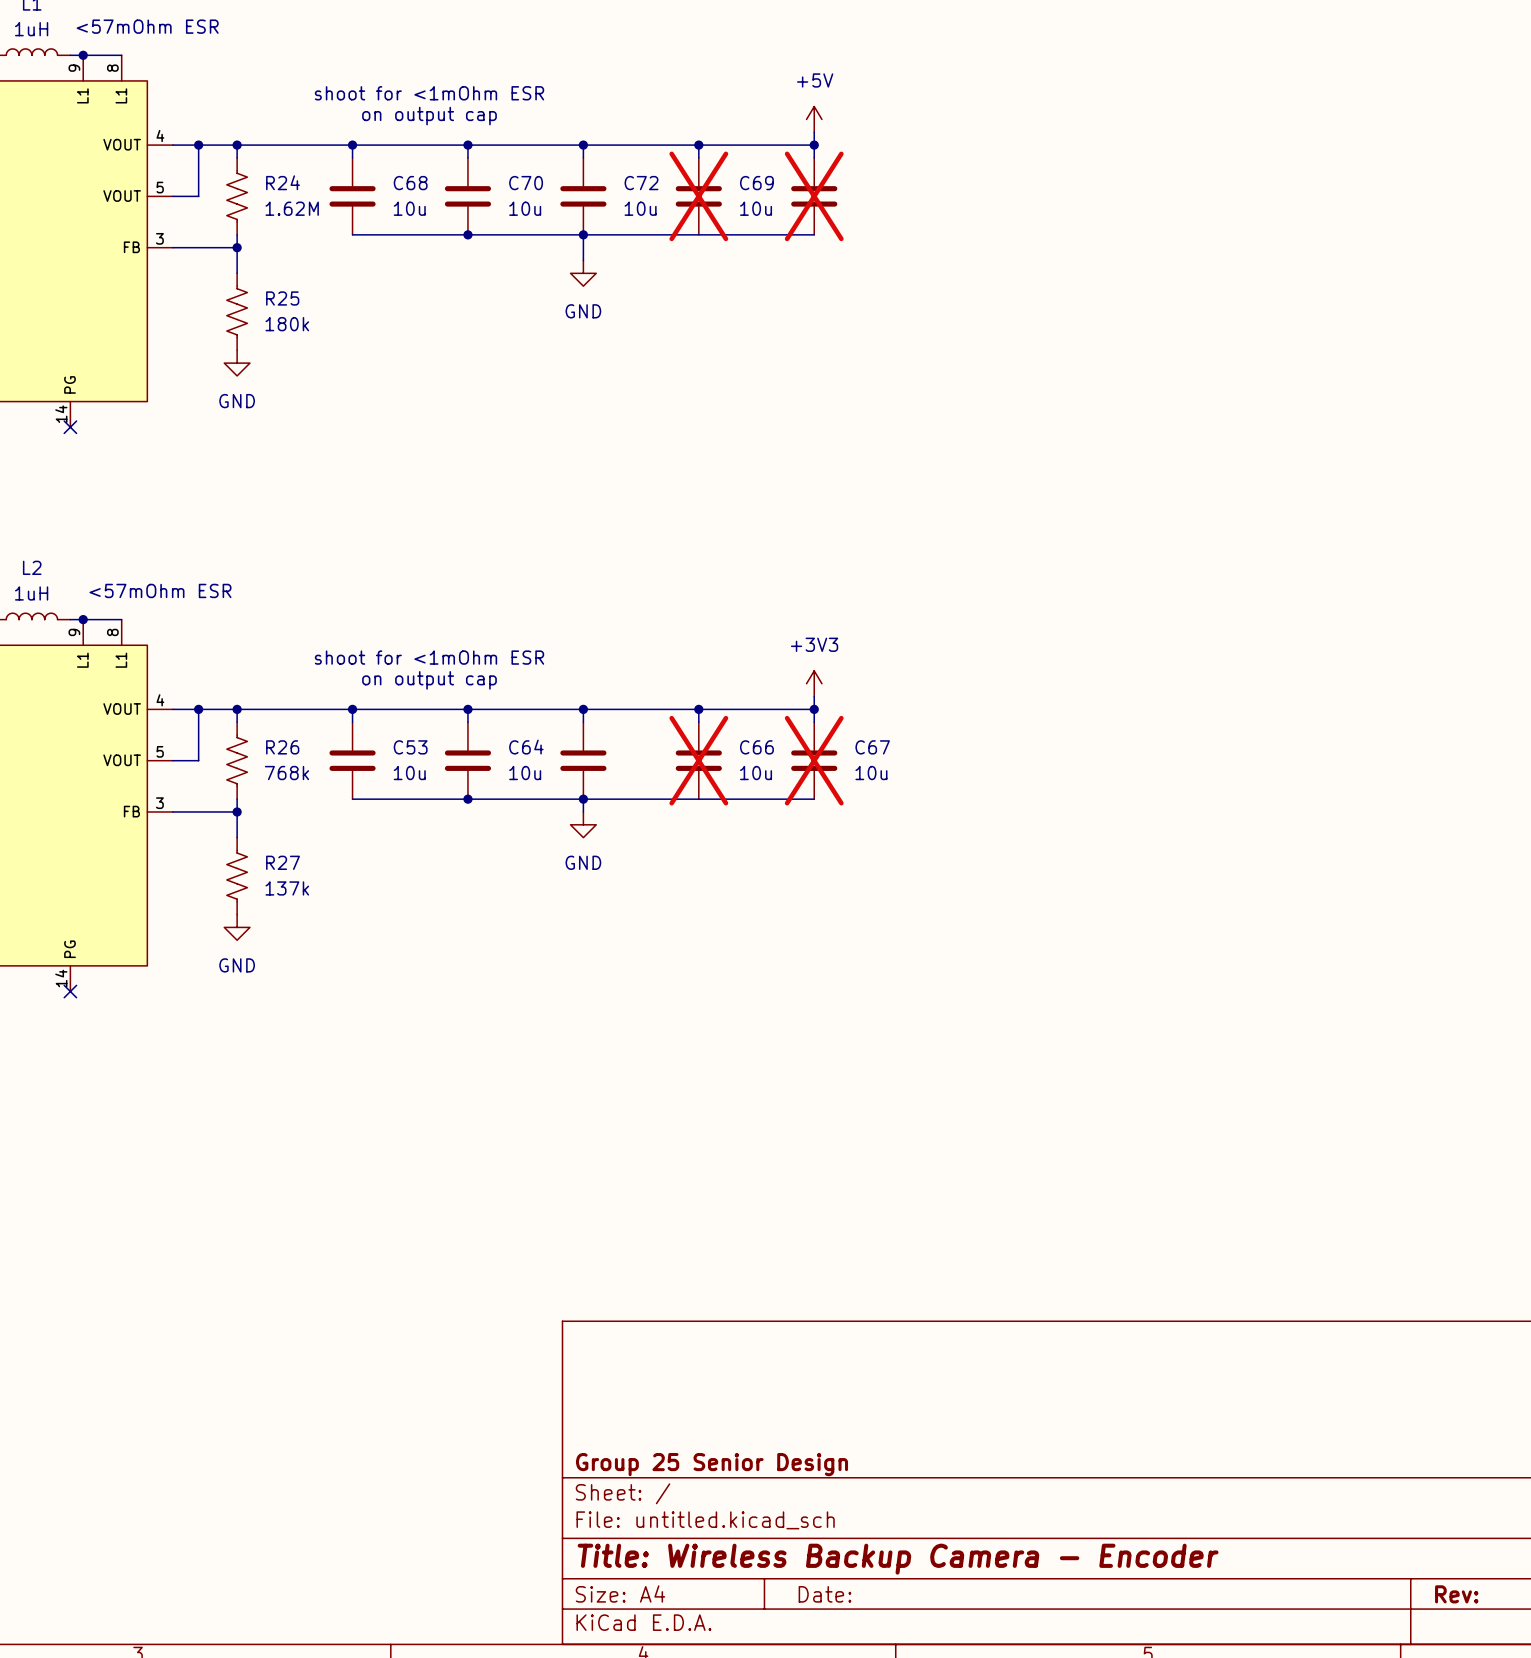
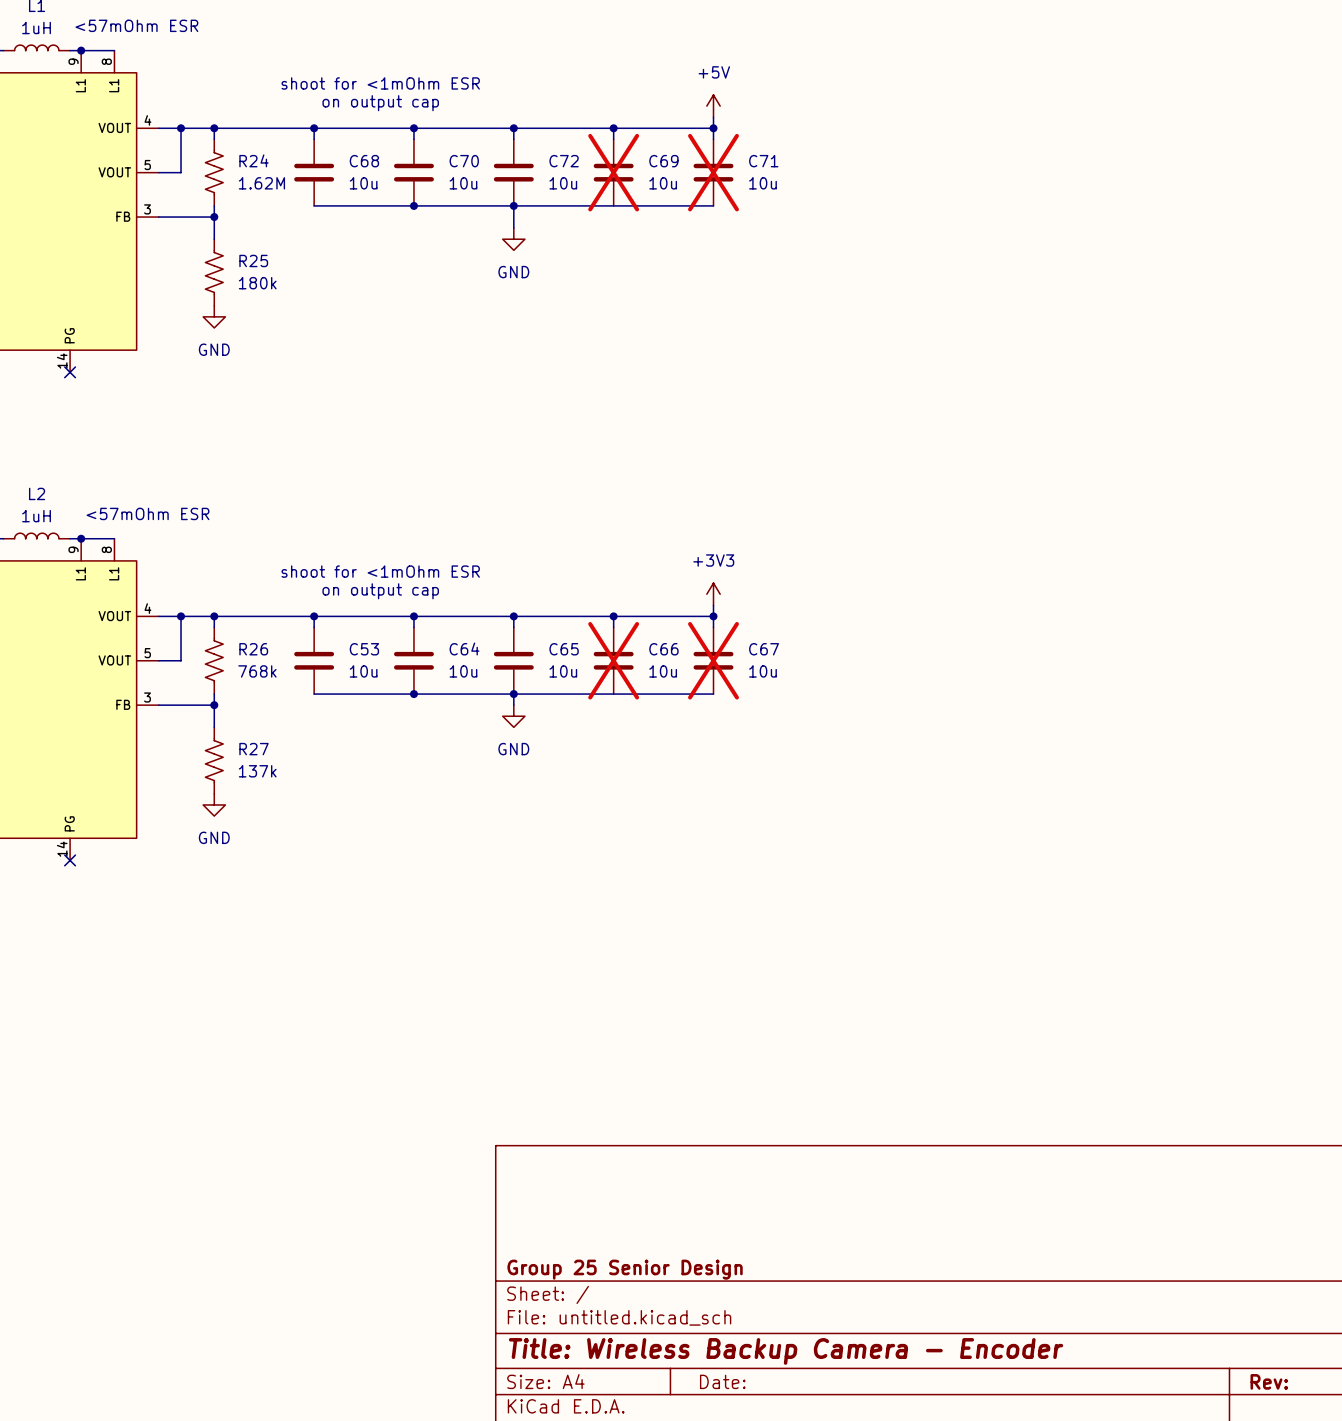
C71 name: none -> C71 (763, 161)
C71 value: none -> 10u (762, 183)
C65 name: none -> C65 (564, 649)
C65 value: none -> 10u (563, 671)

